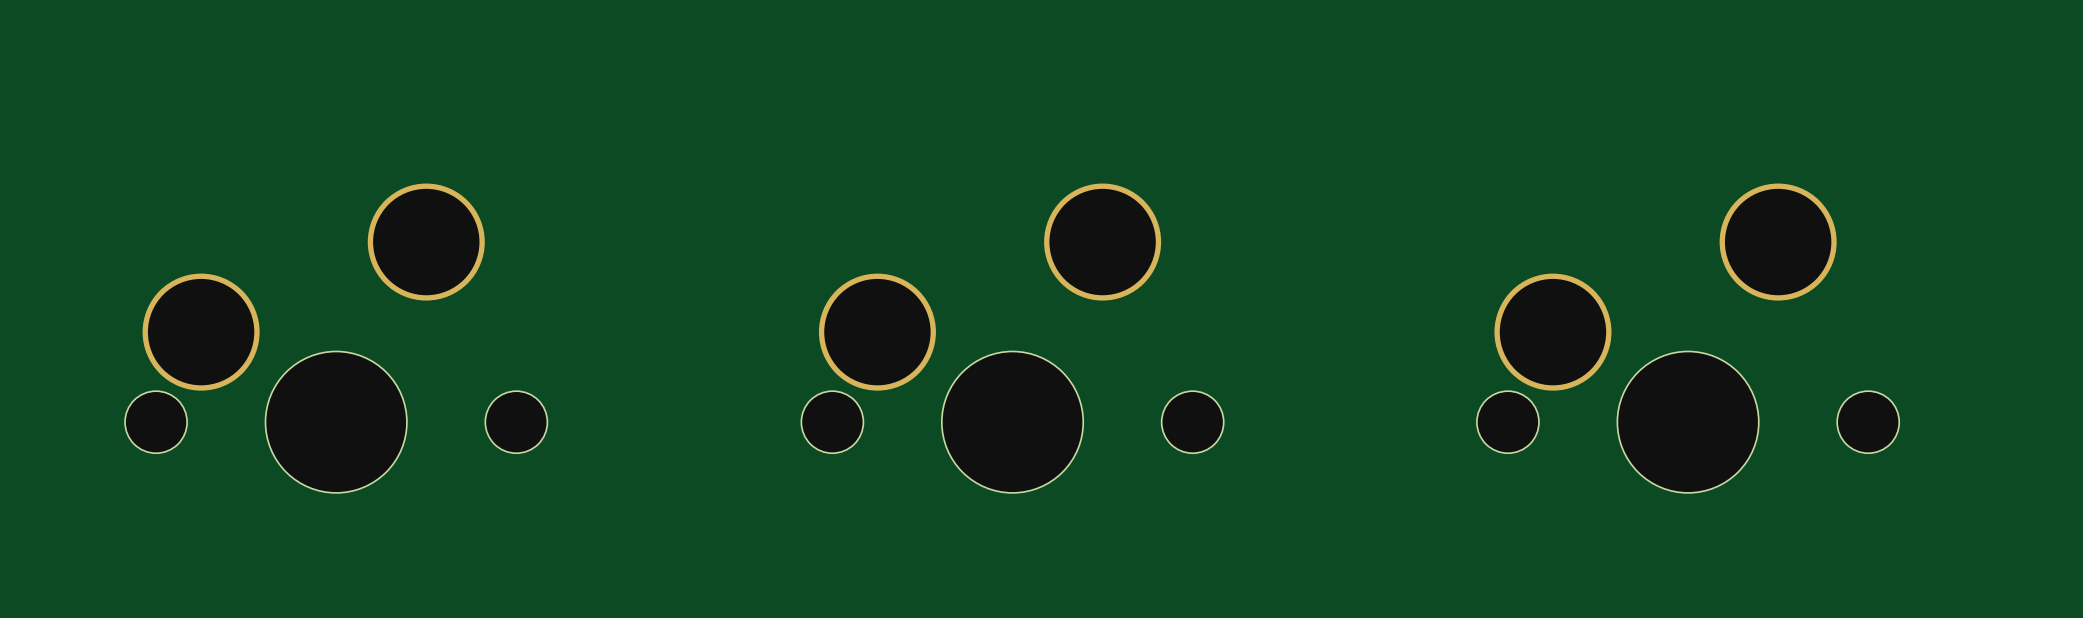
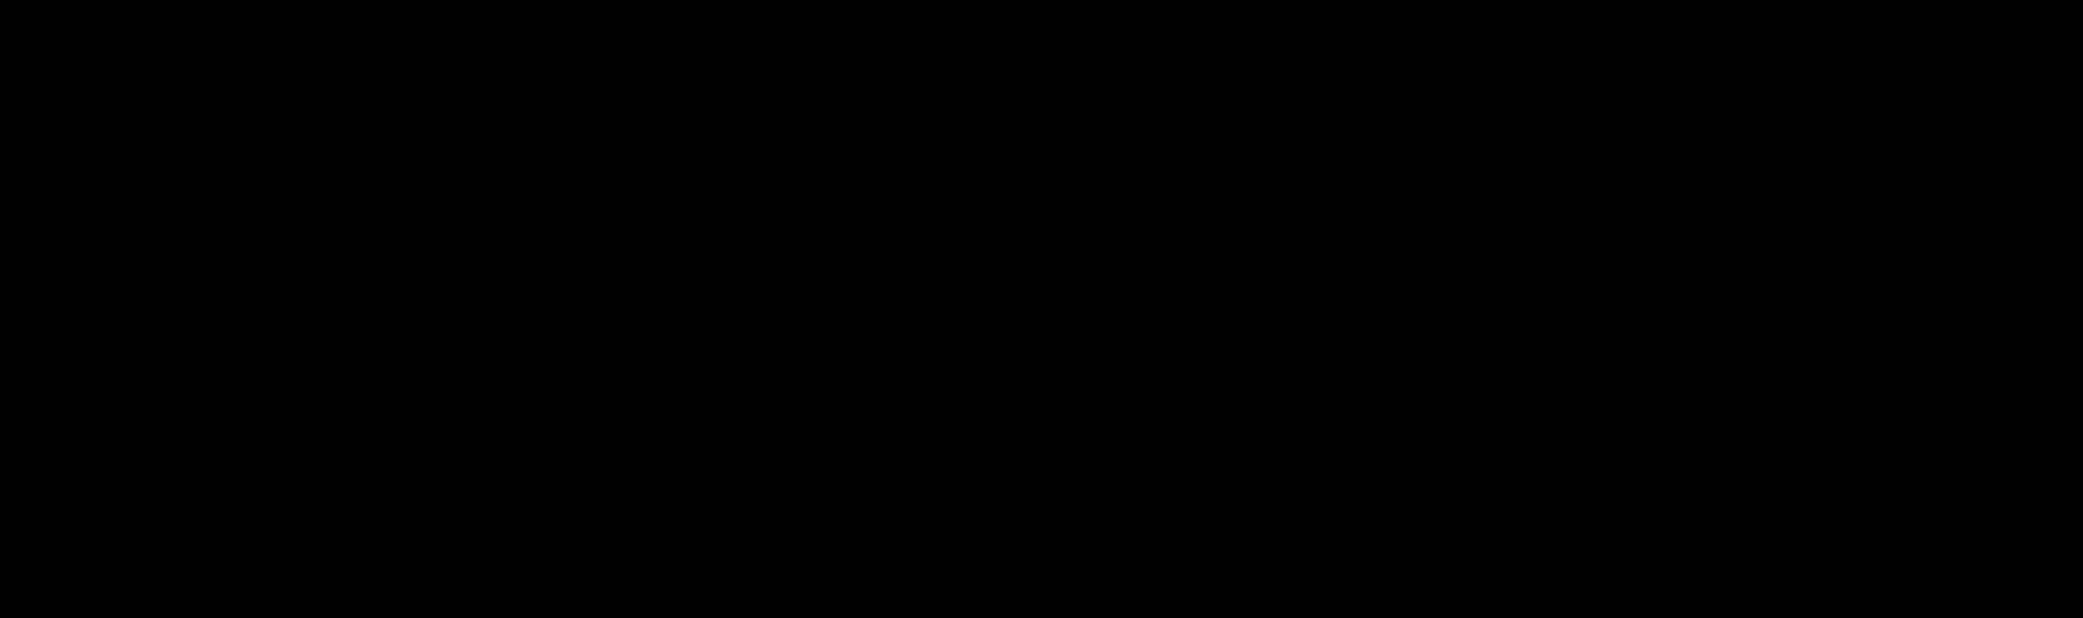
part: (336, 338) -> none
part: (1012, 338) -> none
part: (1688, 338) -> none

